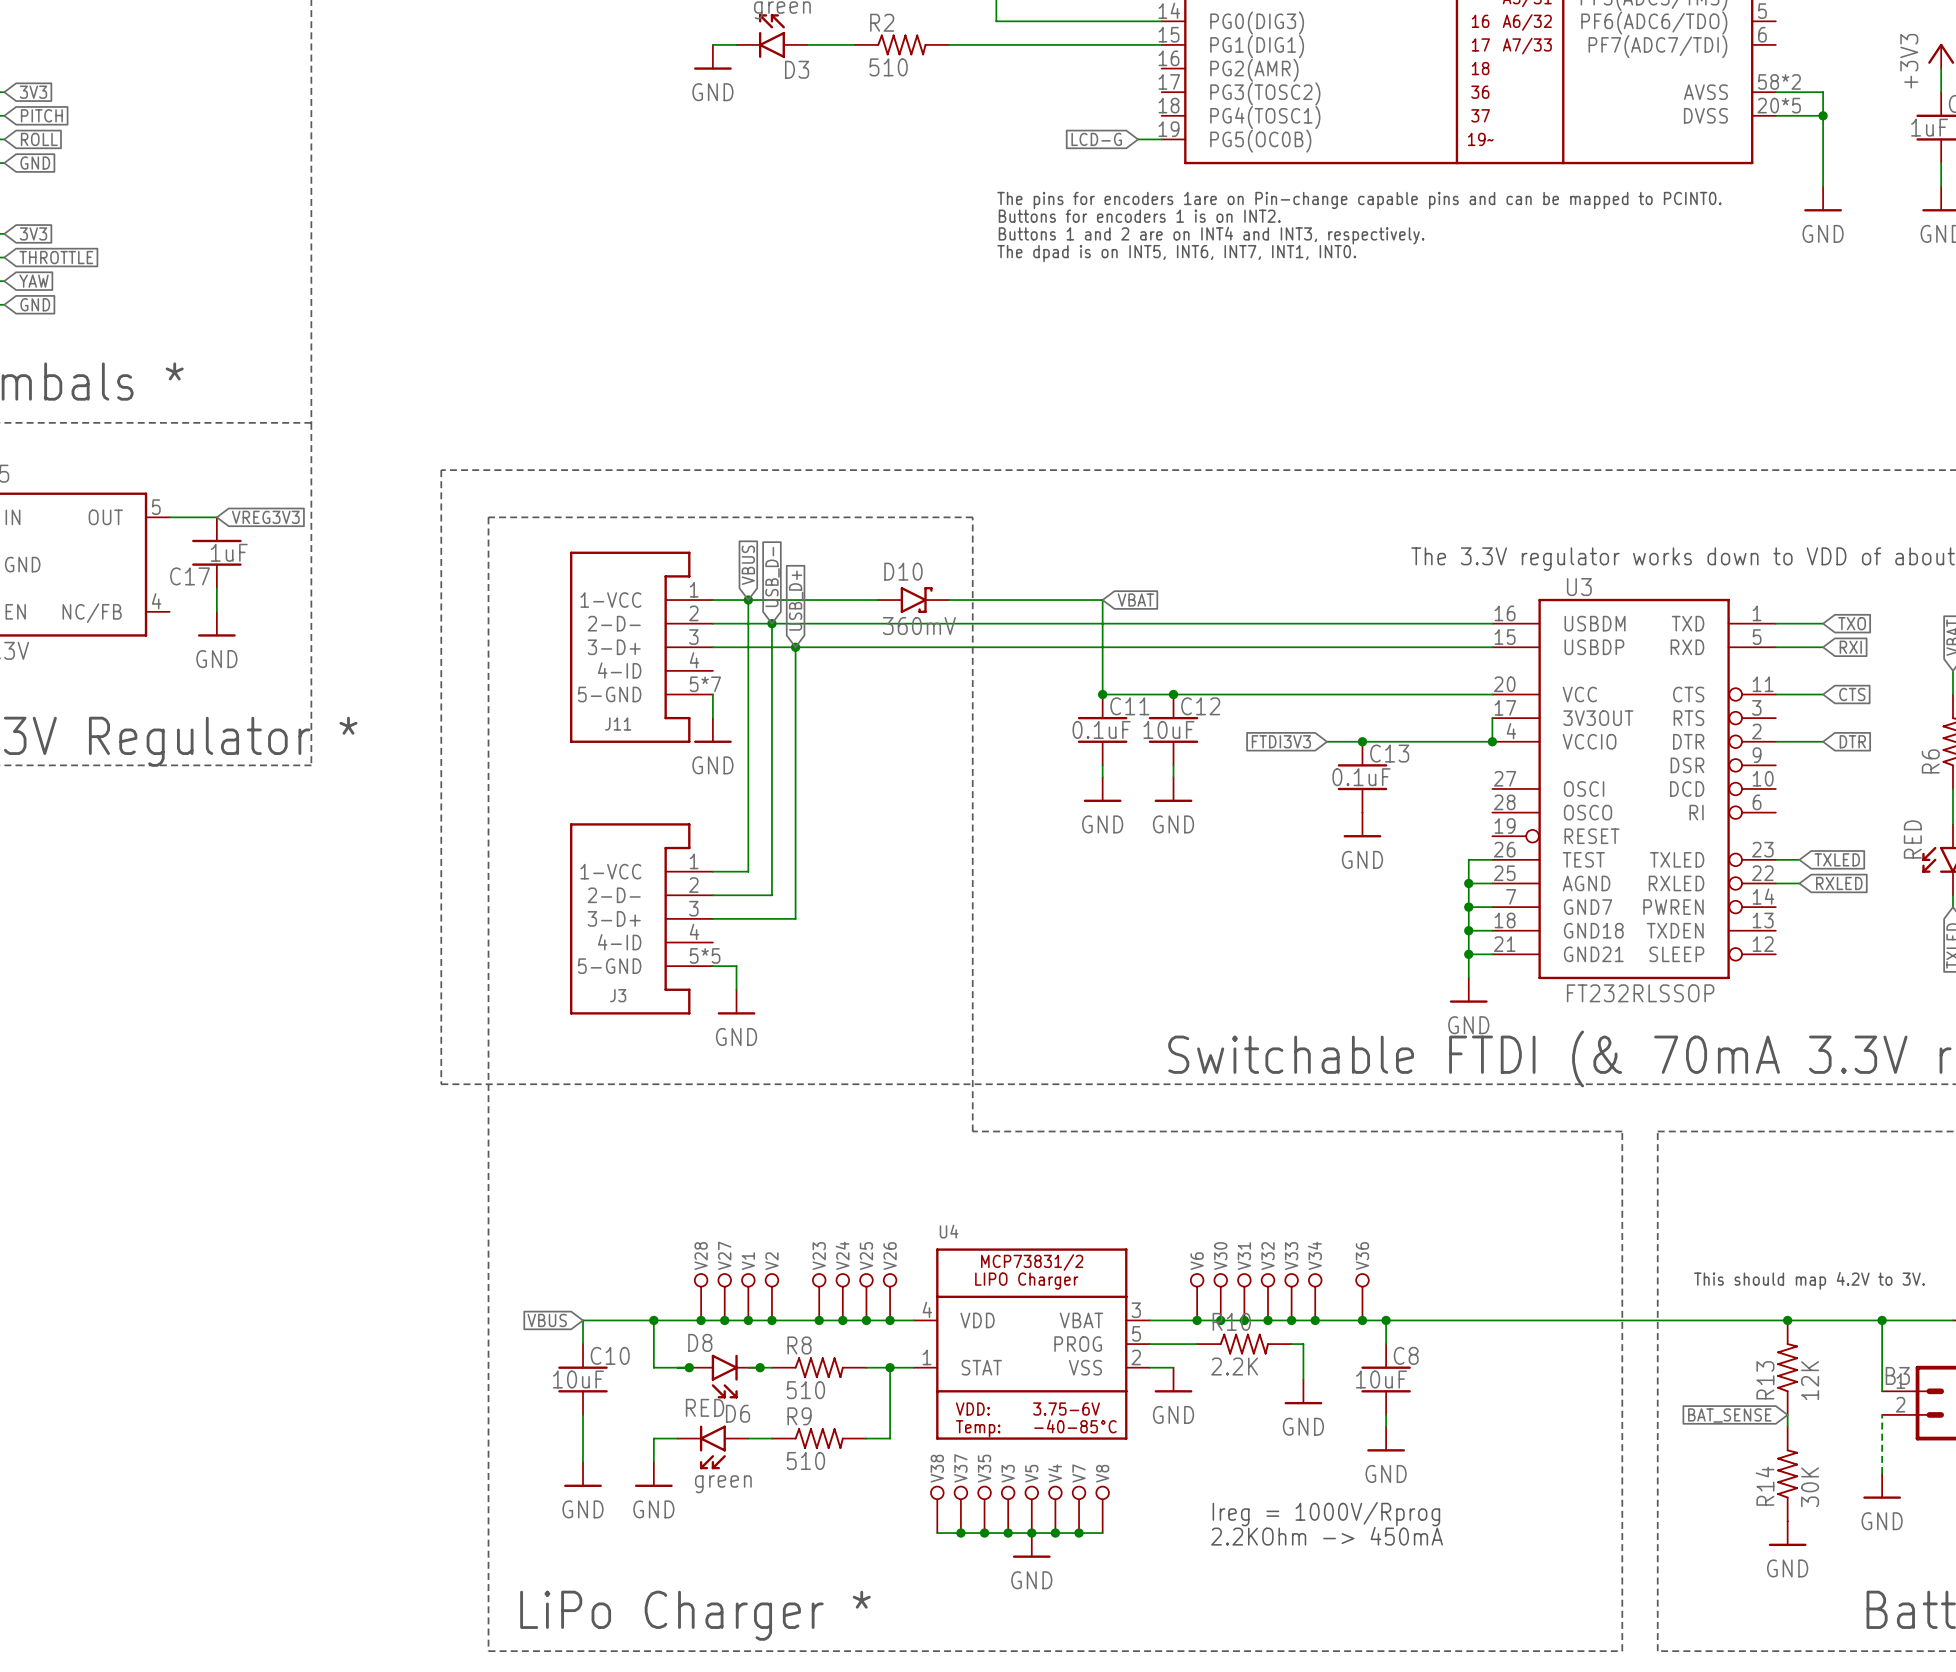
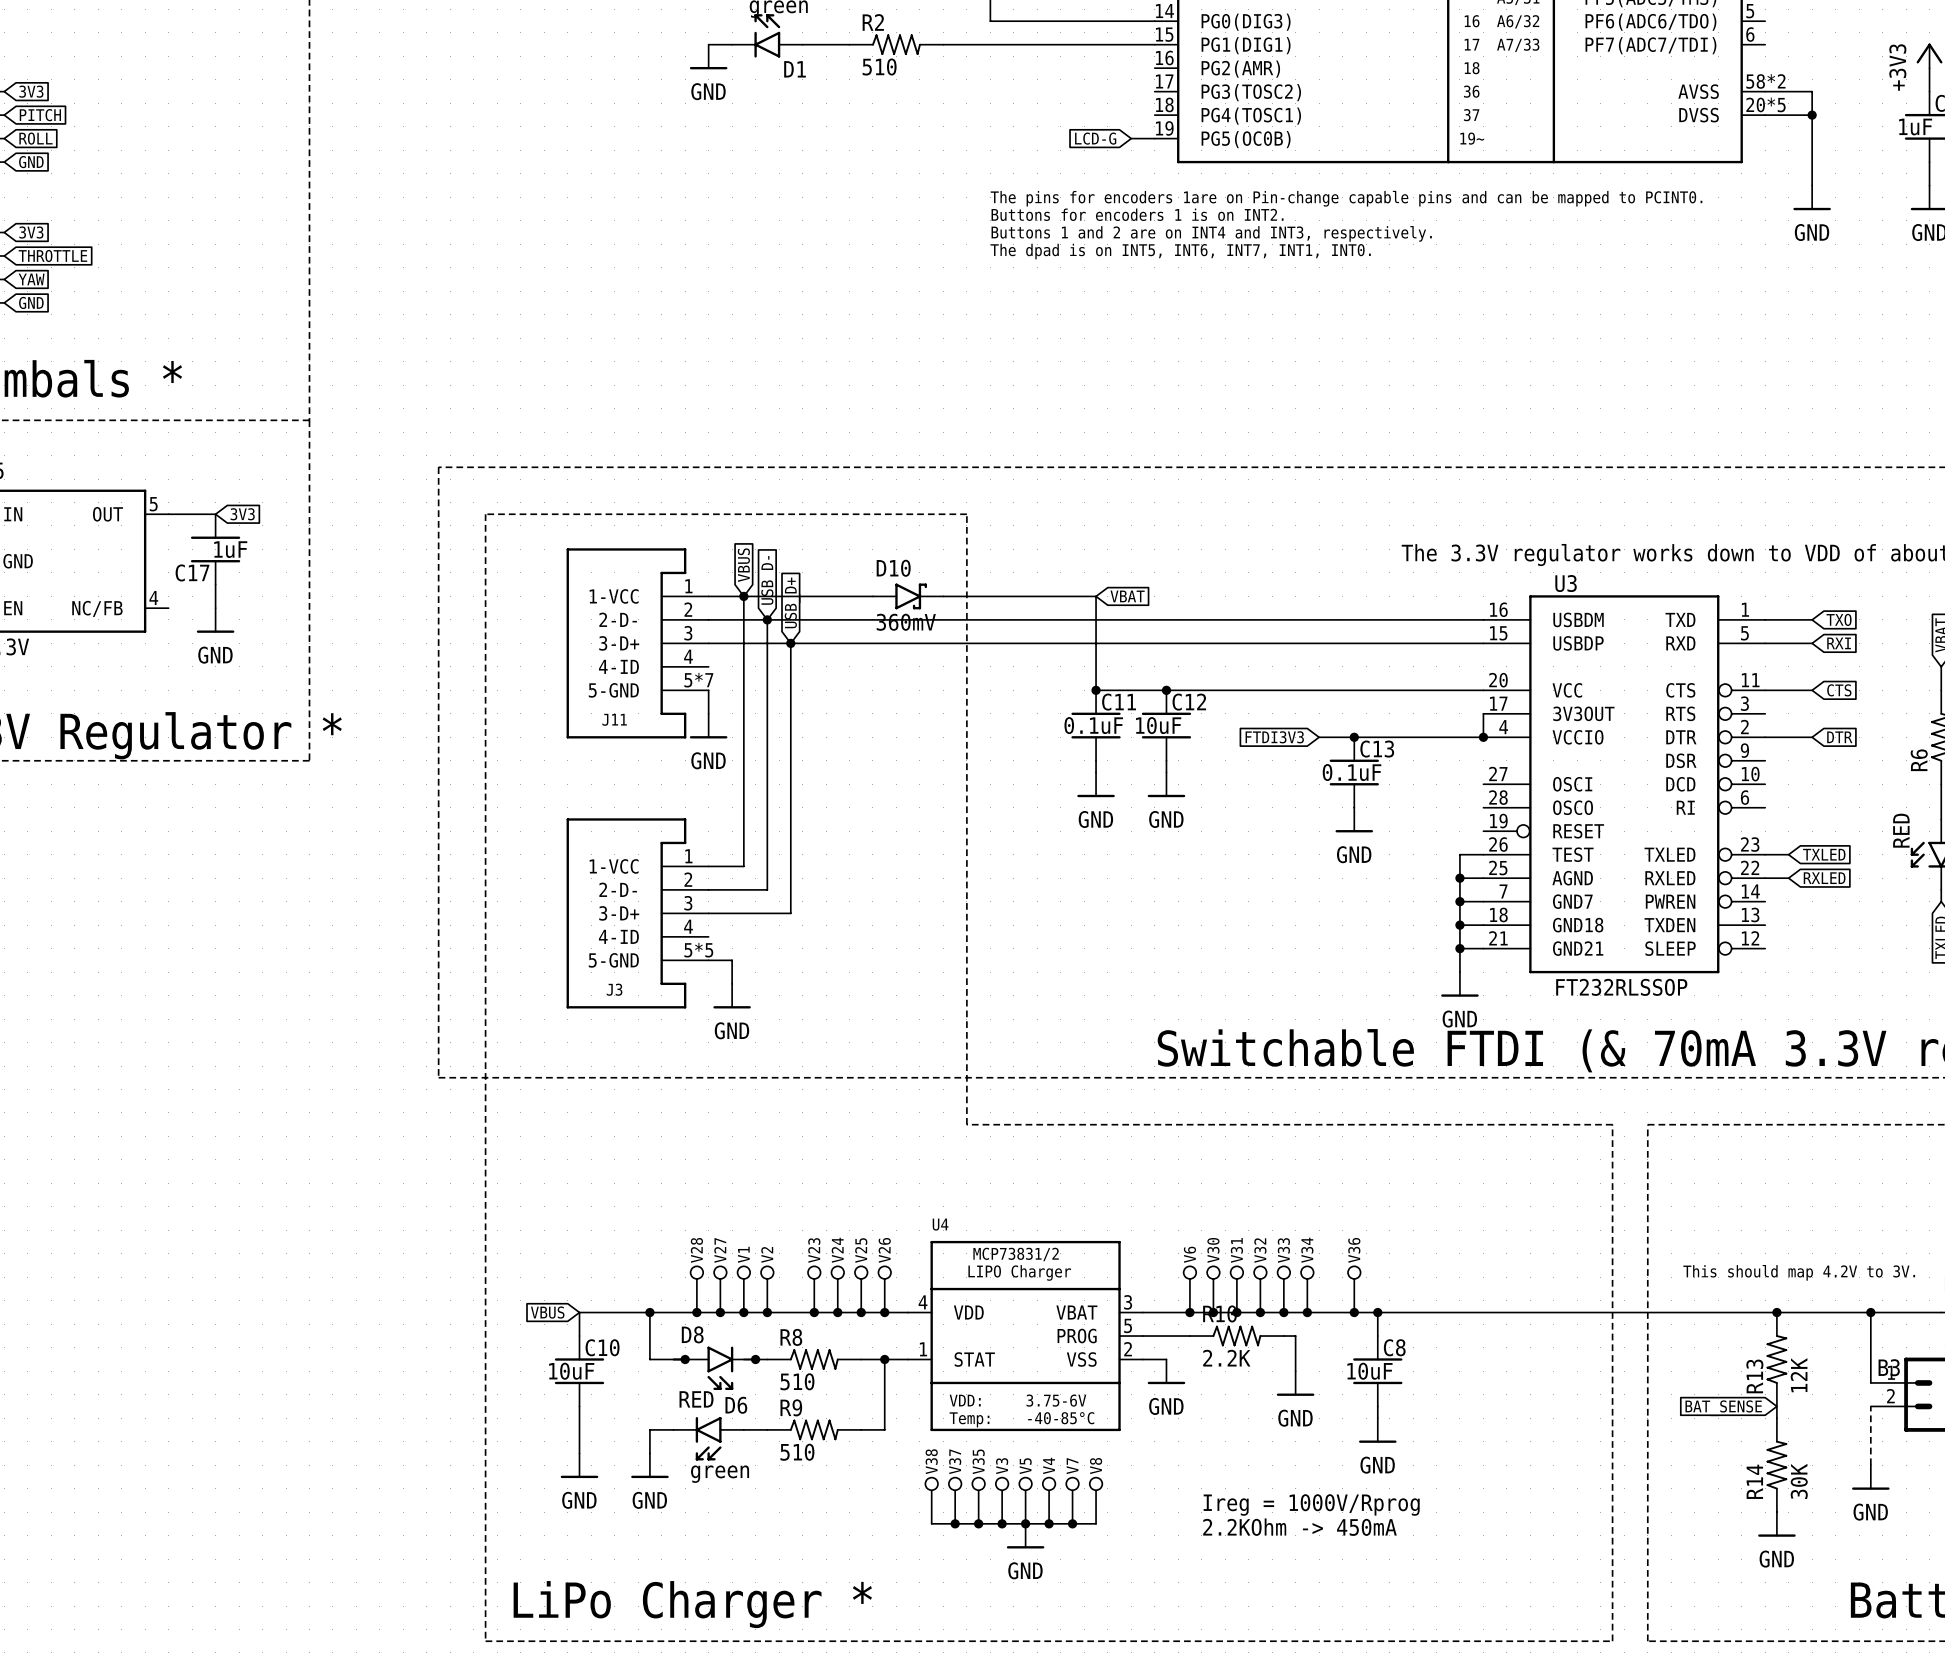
D3 name: D3 (797, 69) -> D1 (795, 69)
global label: VREG3V3 (265, 517) -> 3V3 (242, 514)

